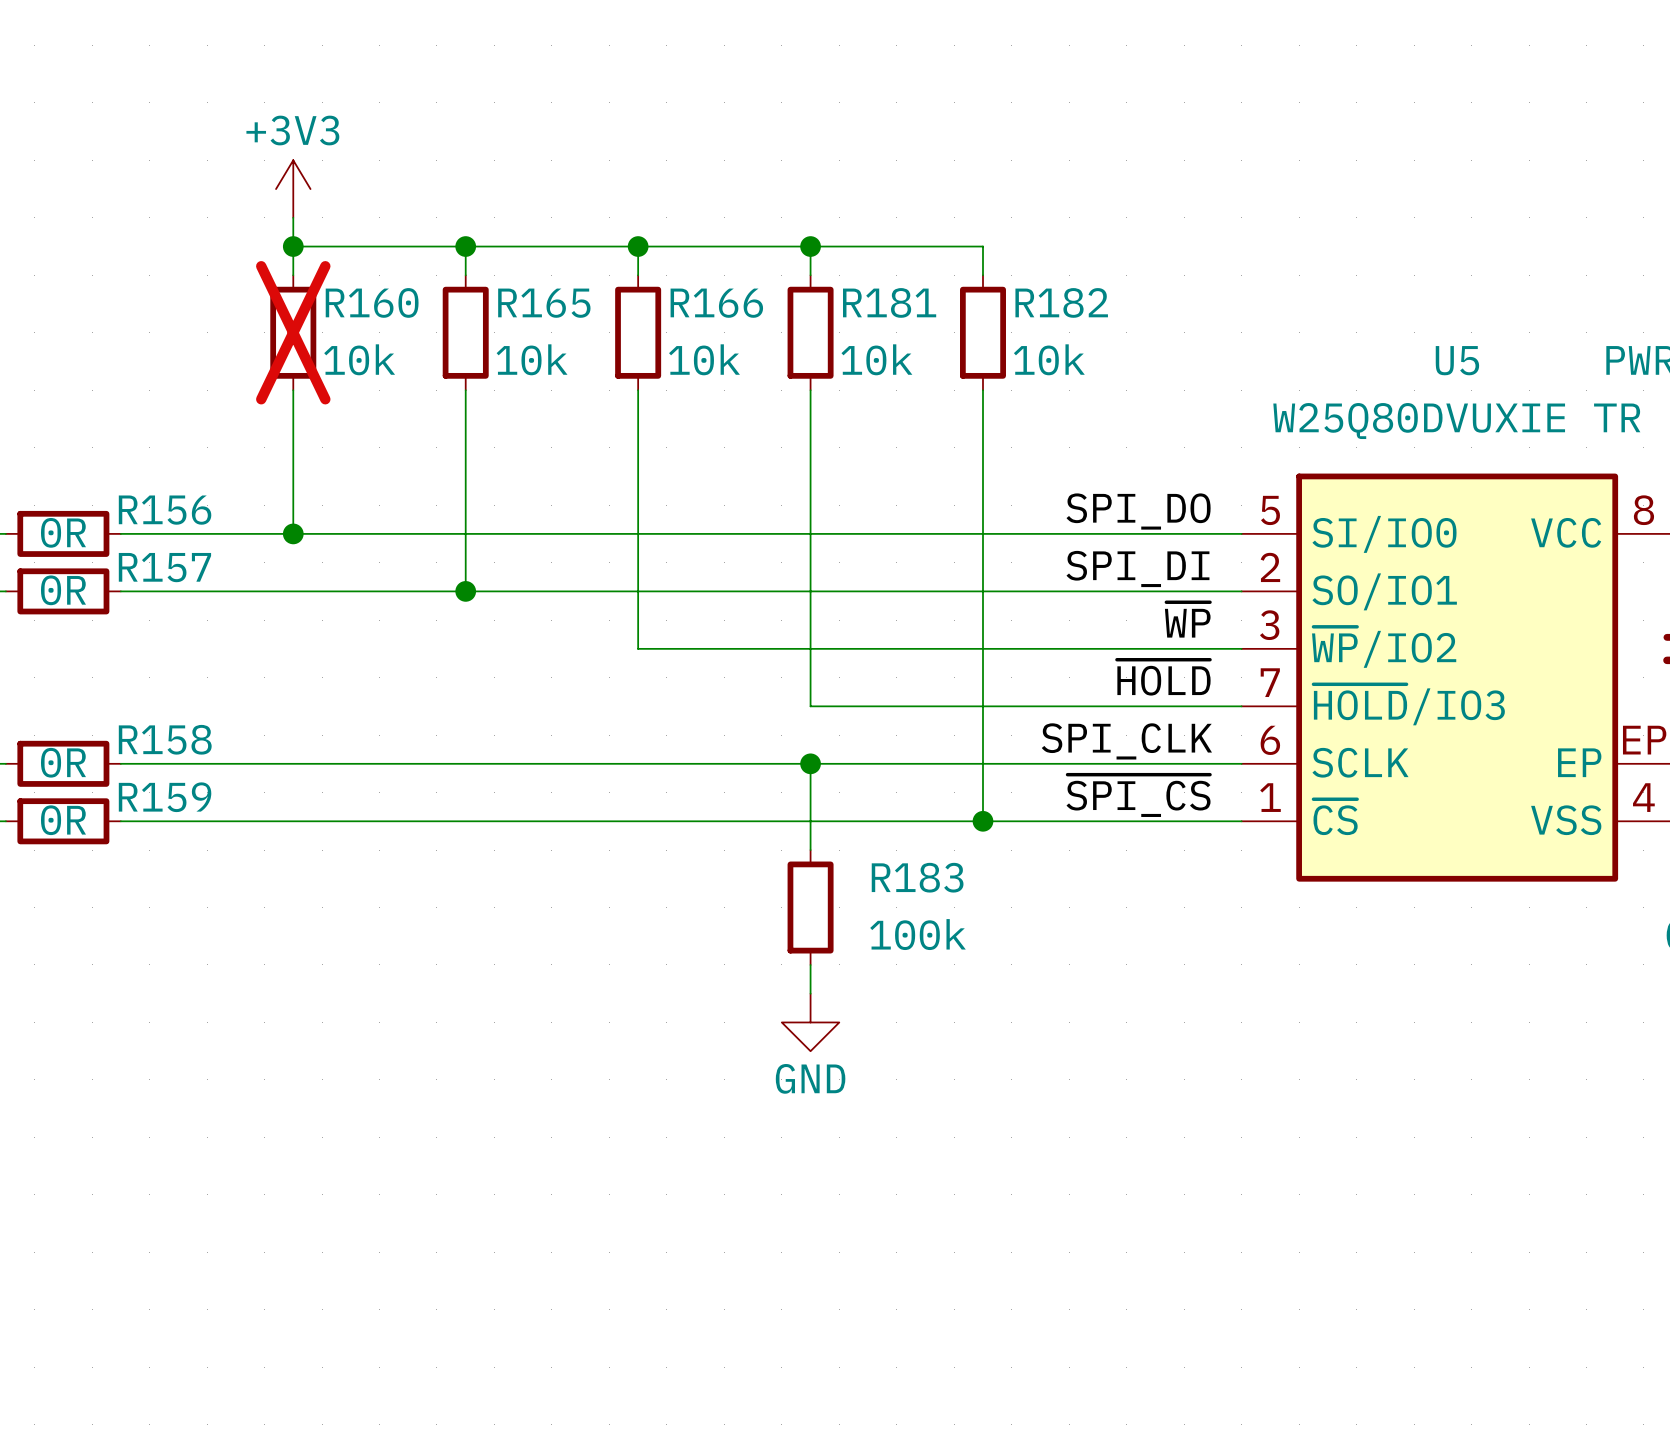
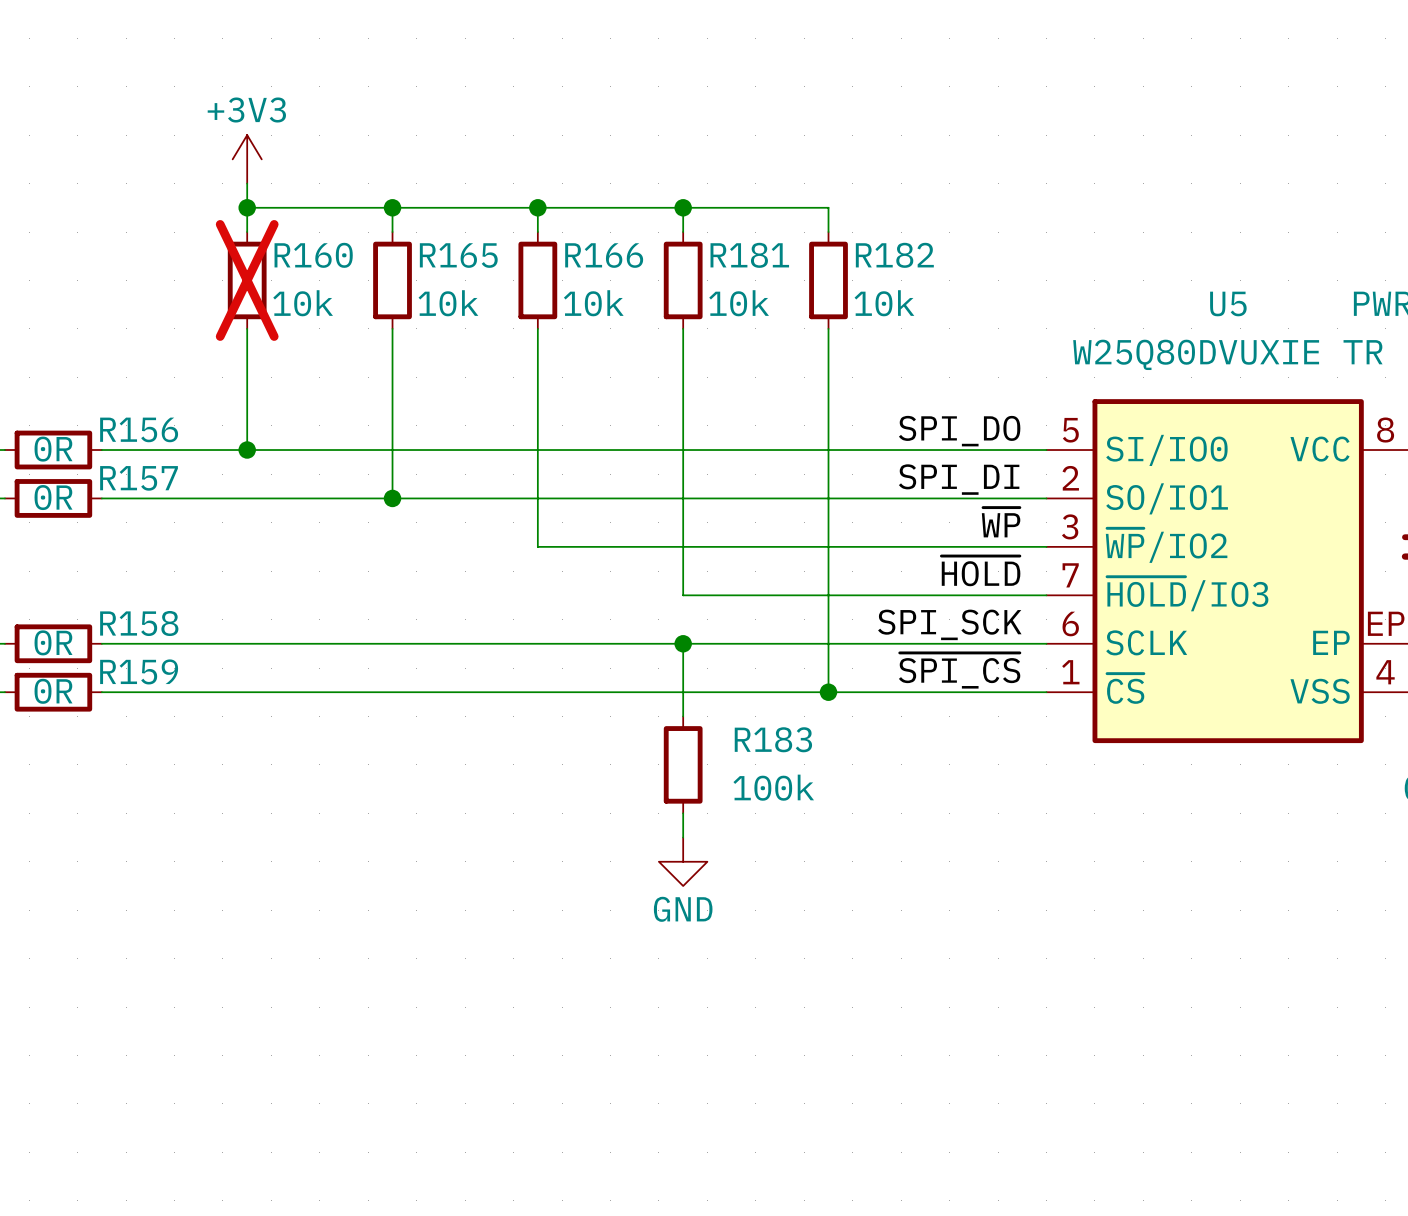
label: SPI_CLK (1126, 741) -> SPI_SCK (949, 624)

